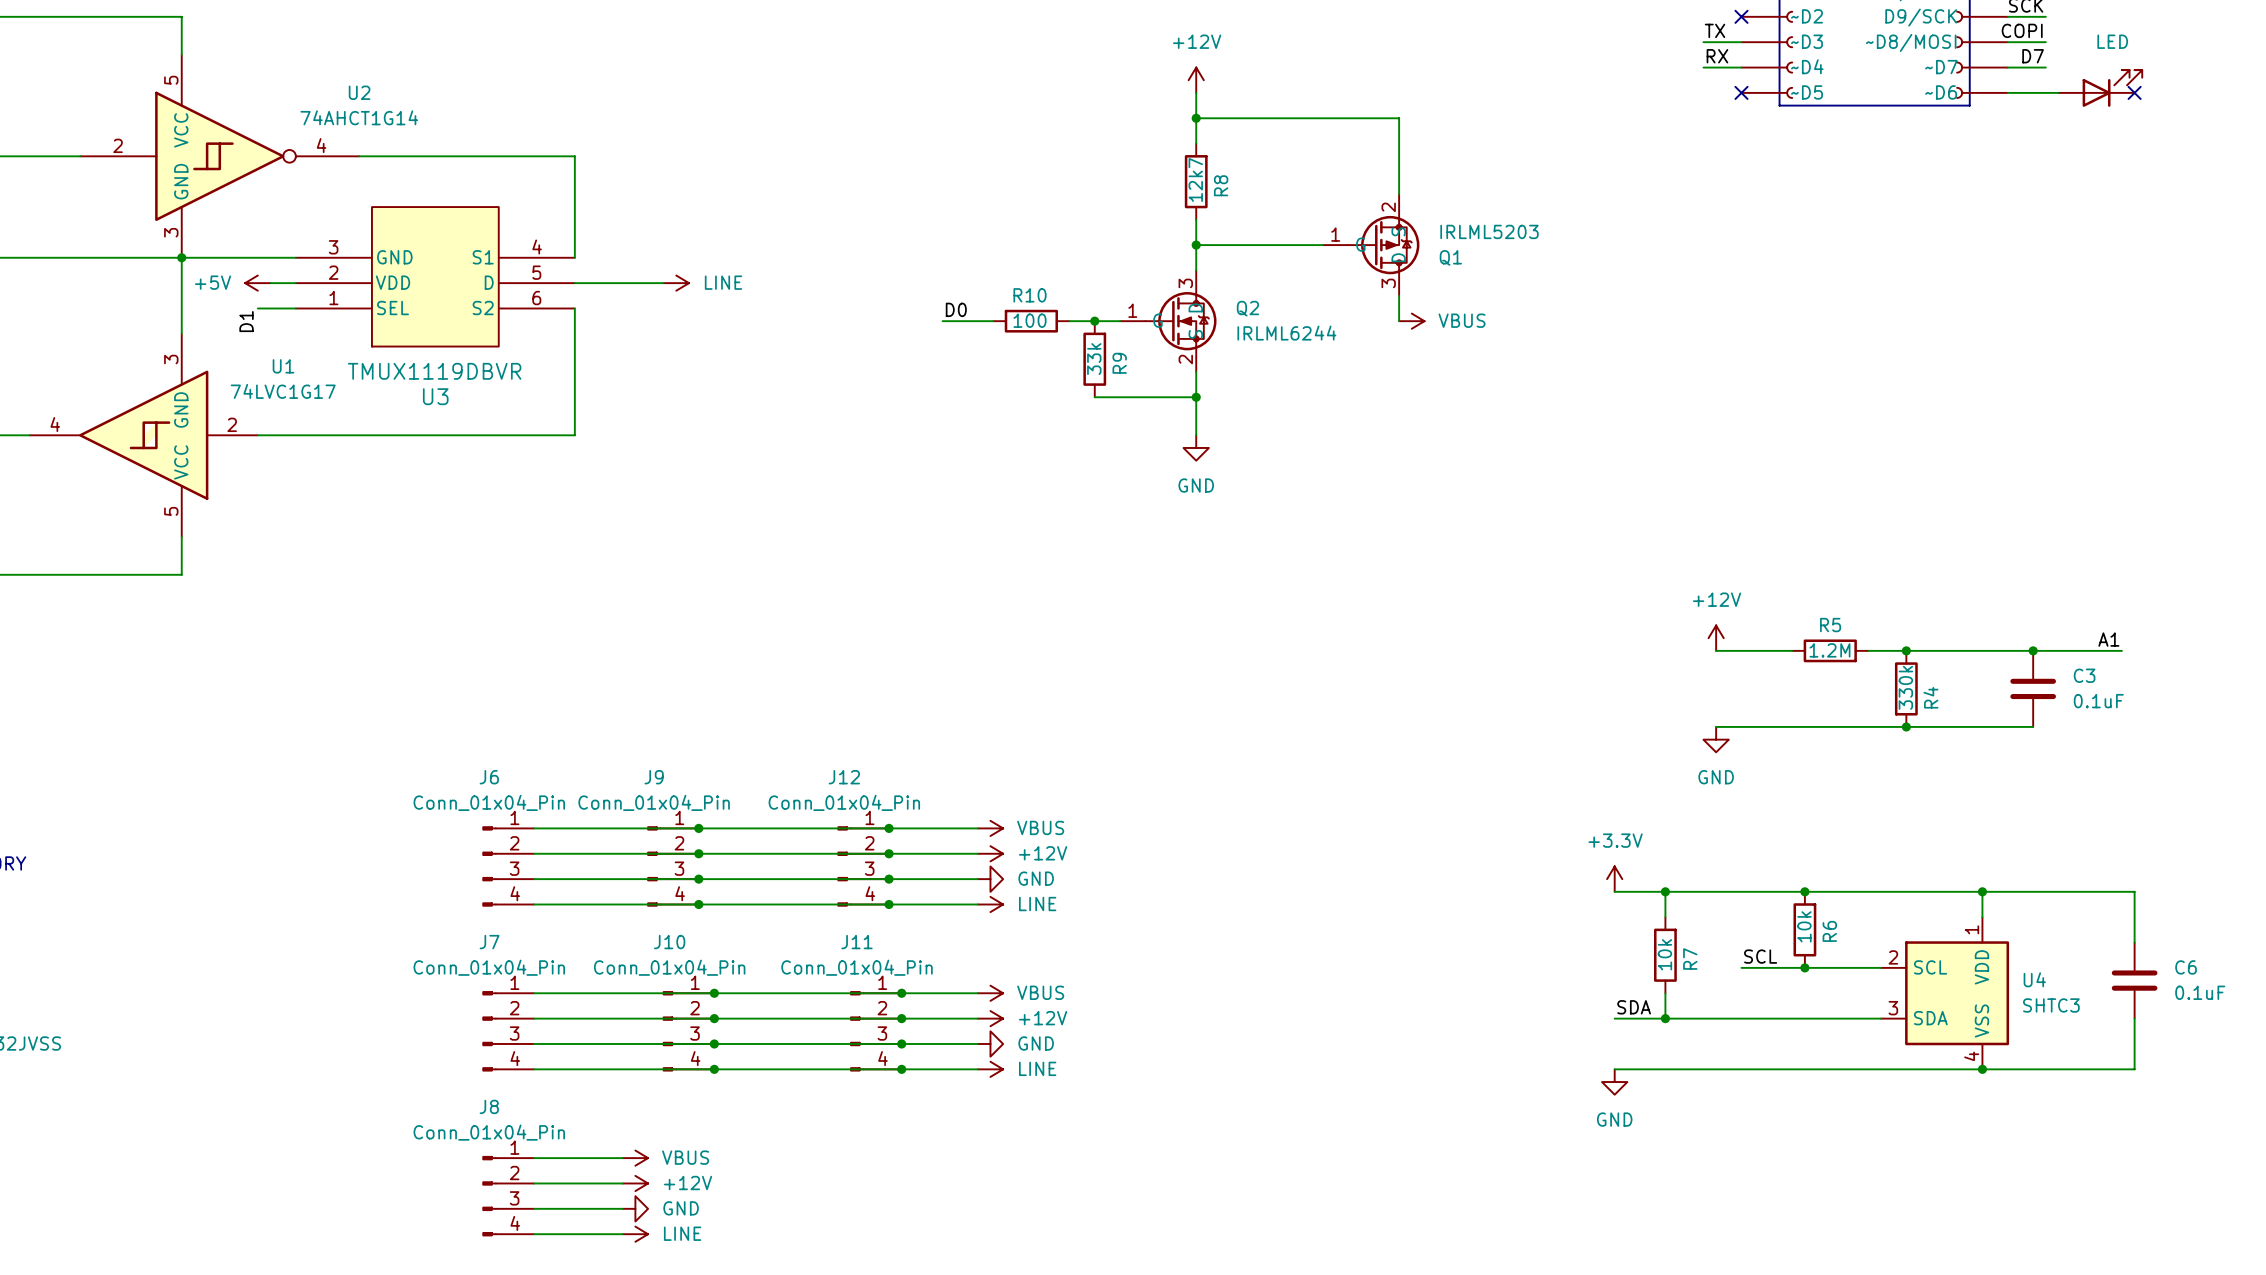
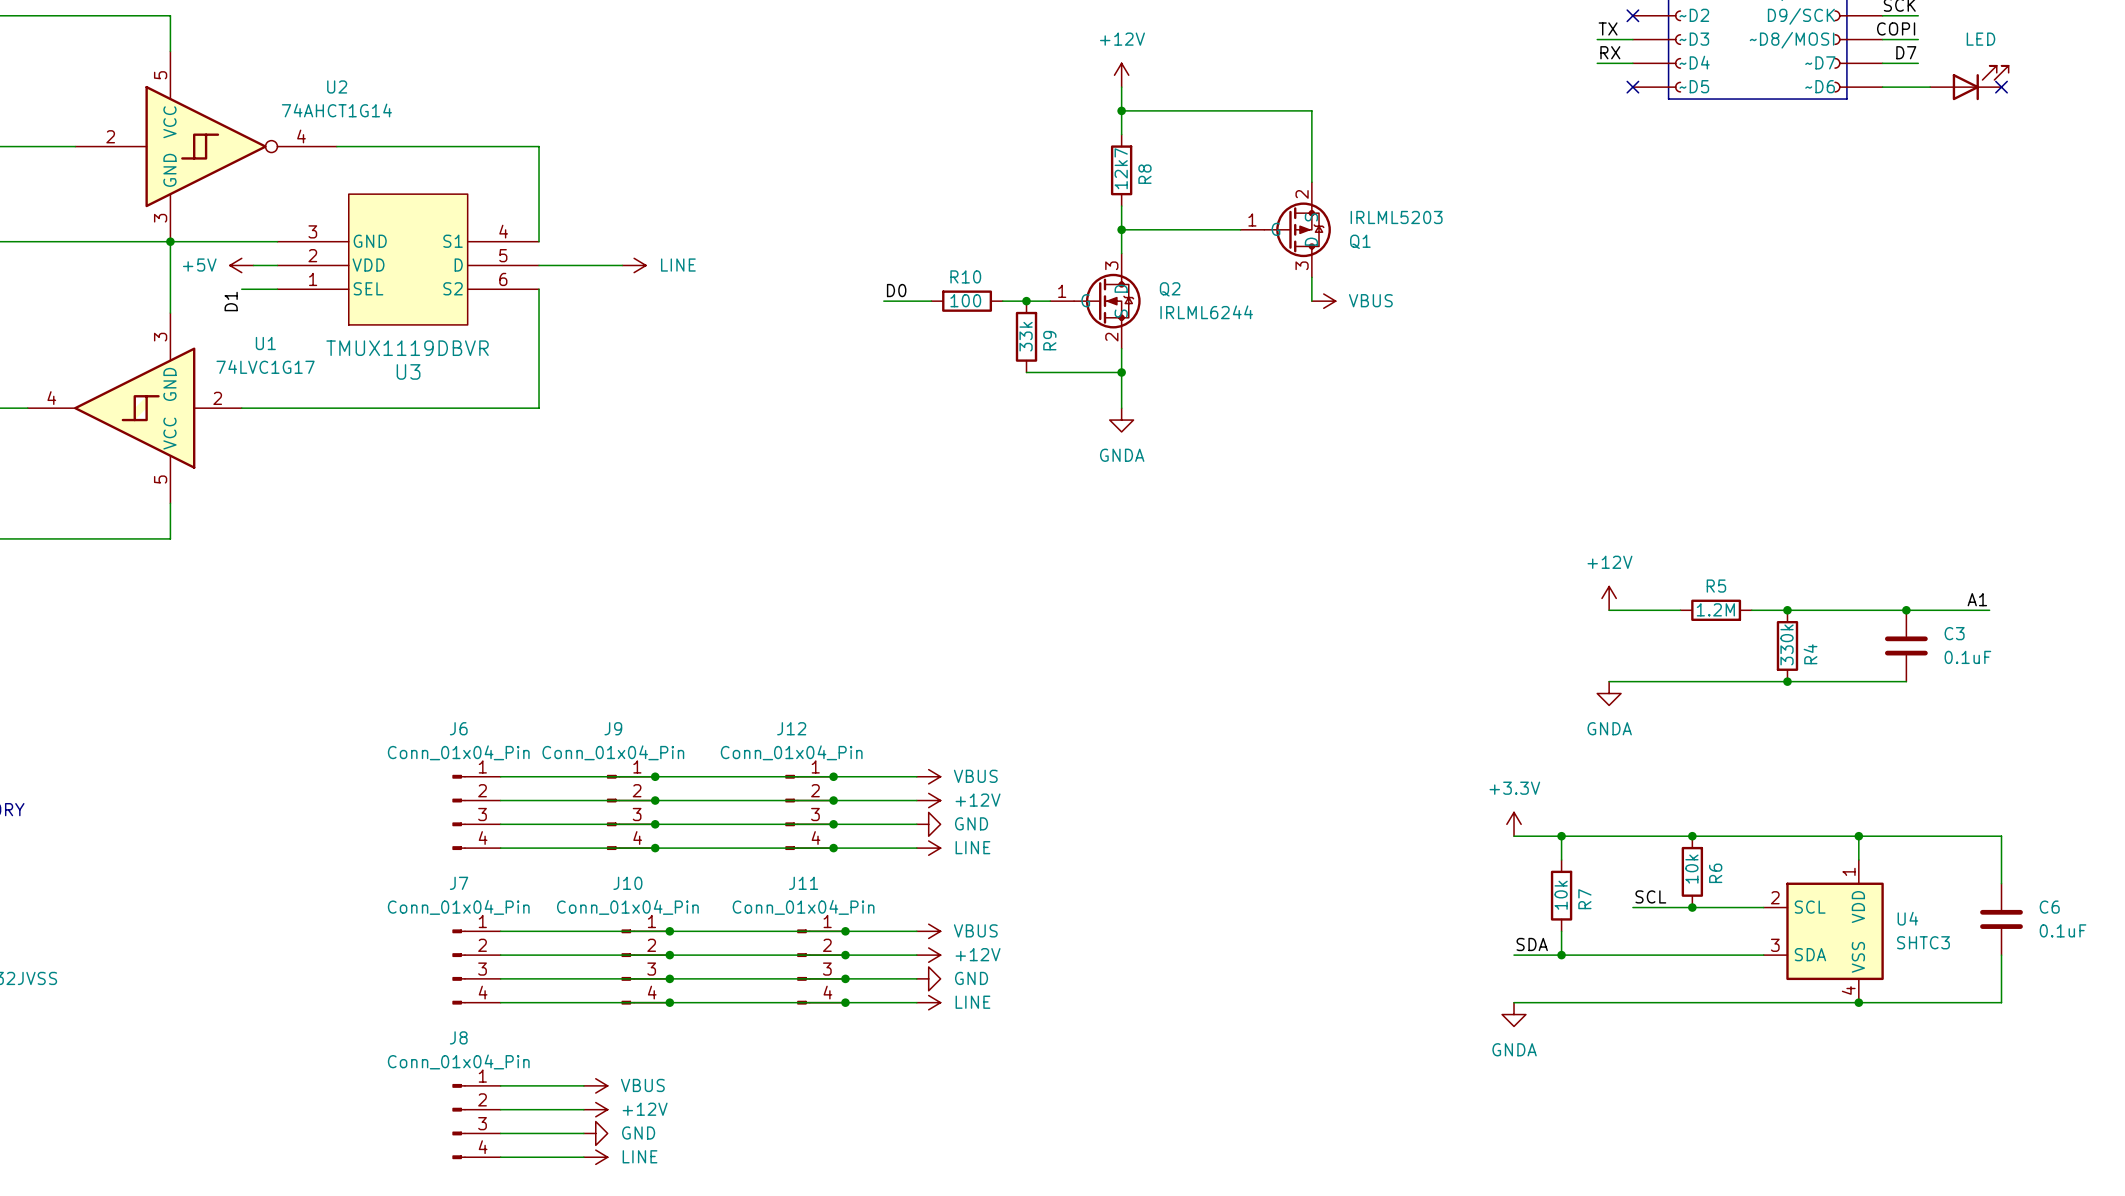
power symbol: GND (1196, 447) -> GNDA (1121, 420)
power symbol: GND (1716, 739) -> GNDA (1609, 693)
power symbol: GND (1614, 1082) -> GNDA (1514, 1014)

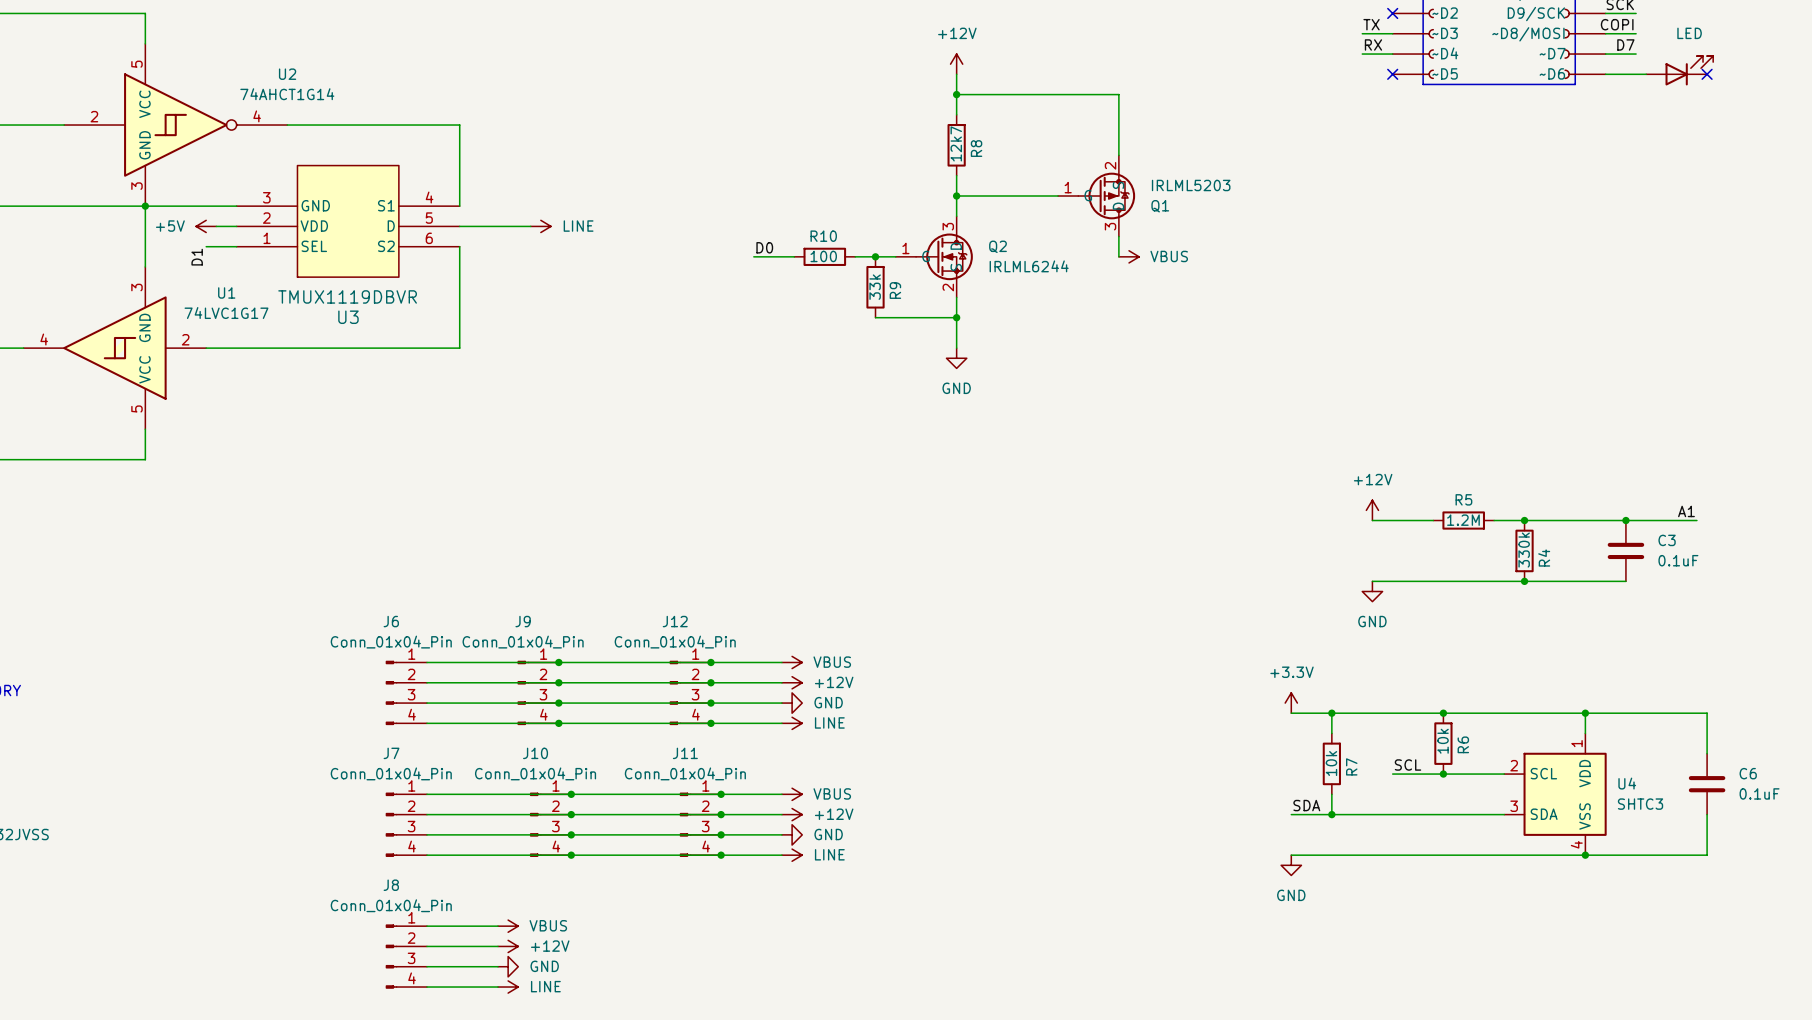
power symbol: GNDA (1121, 420) -> GND (956, 358)
power symbol: GNDA (1609, 693) -> GND (1372, 591)
power symbol: GNDA (1514, 1014) -> GND (1291, 865)

